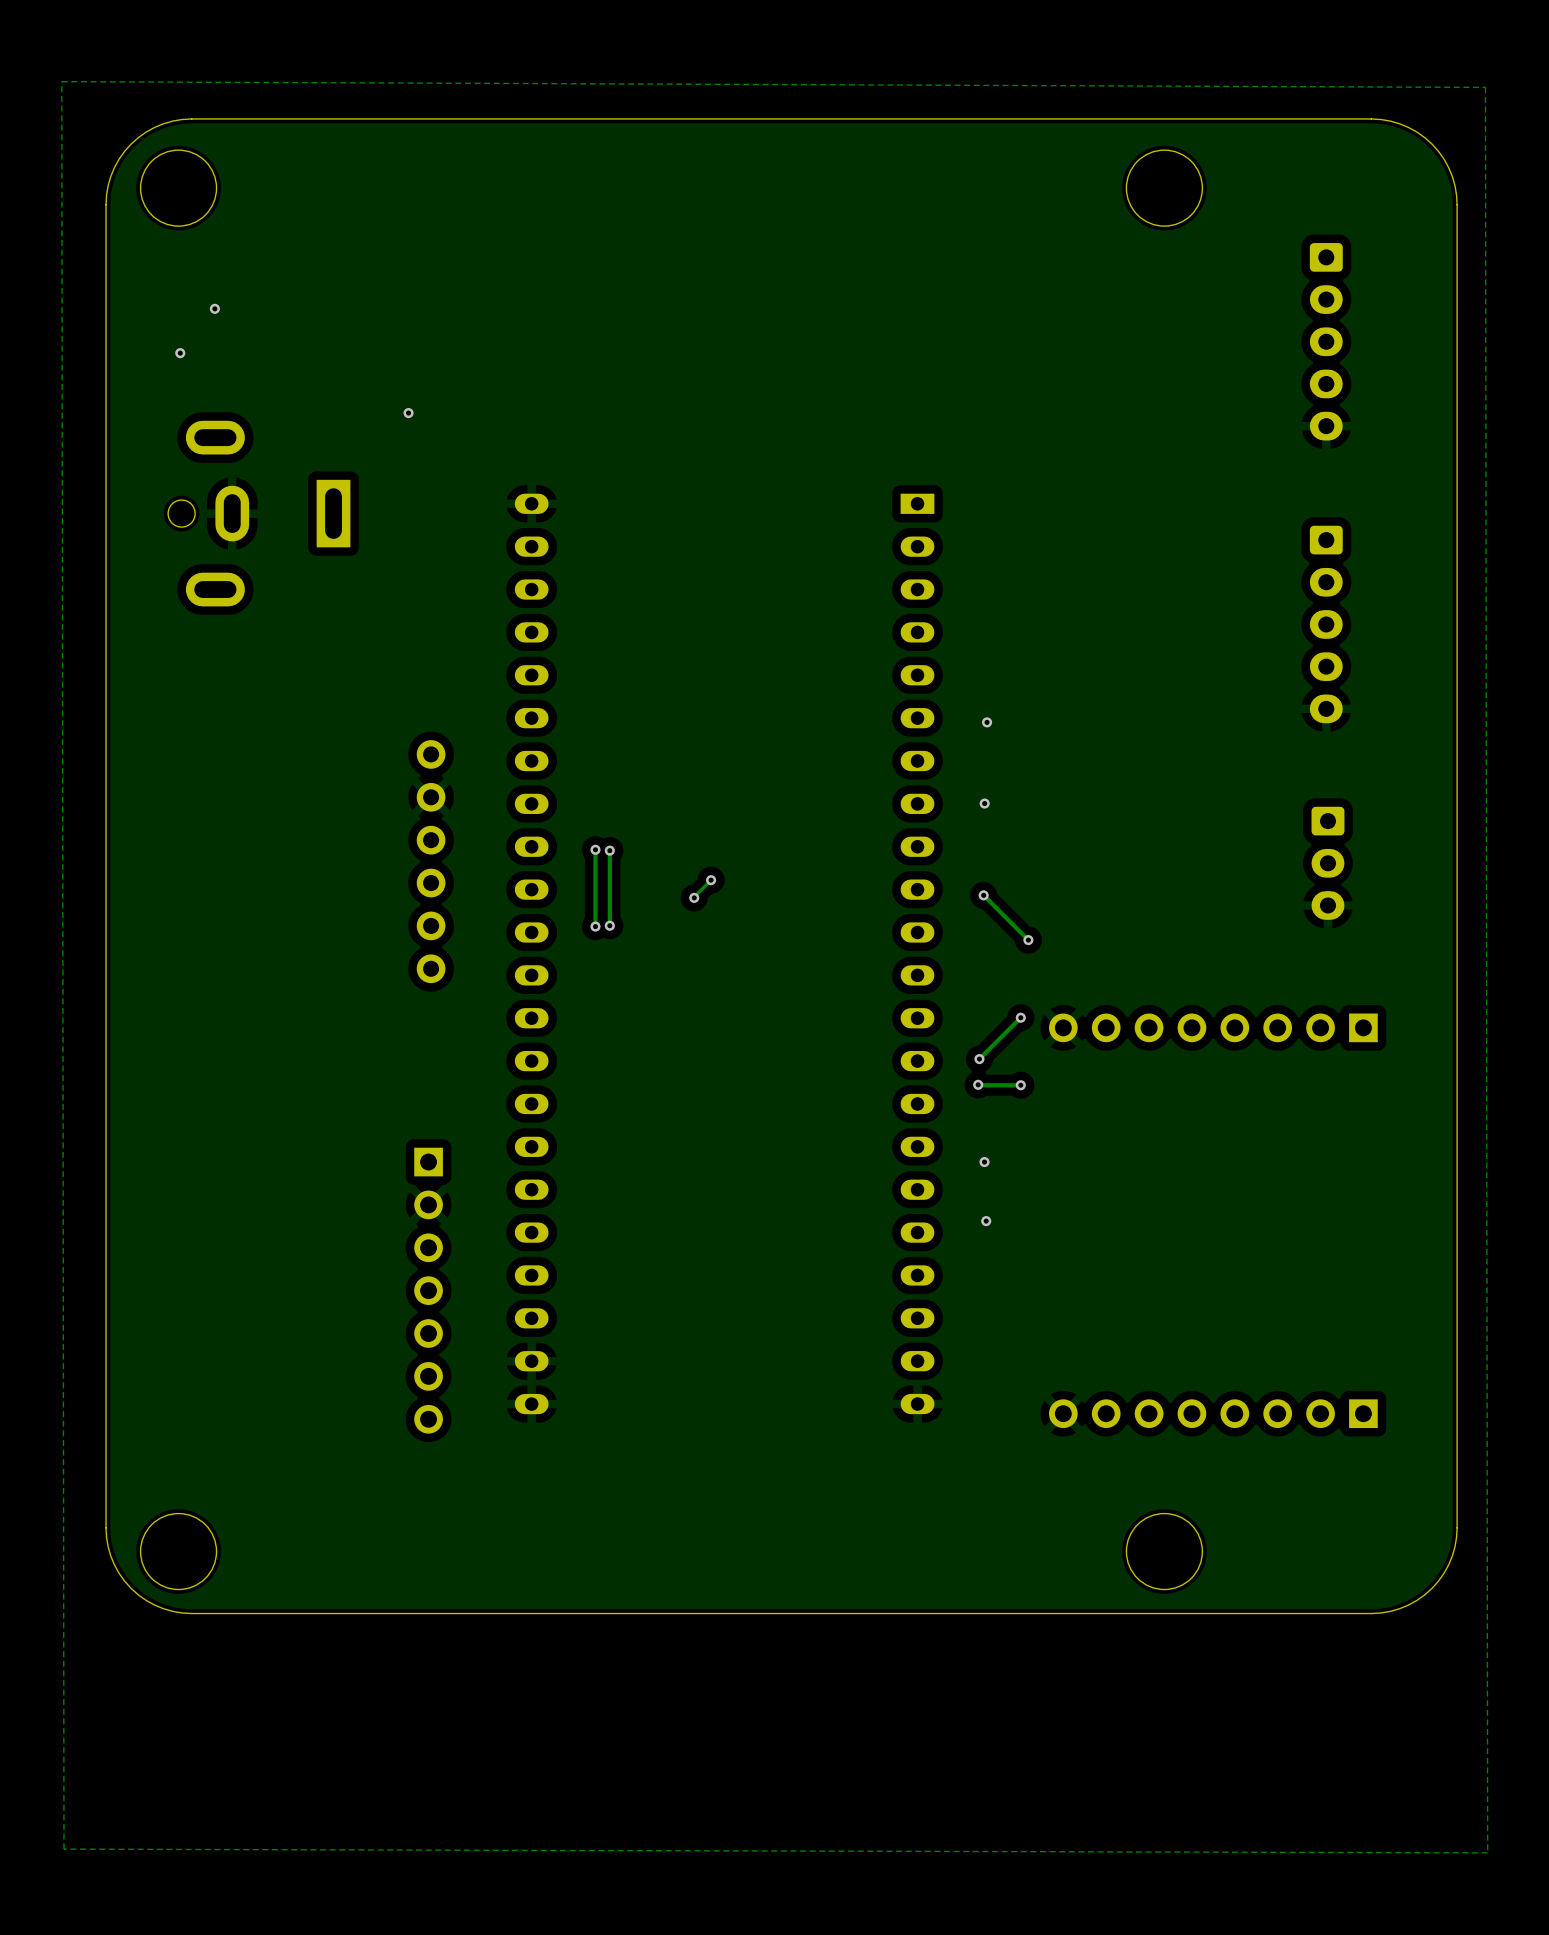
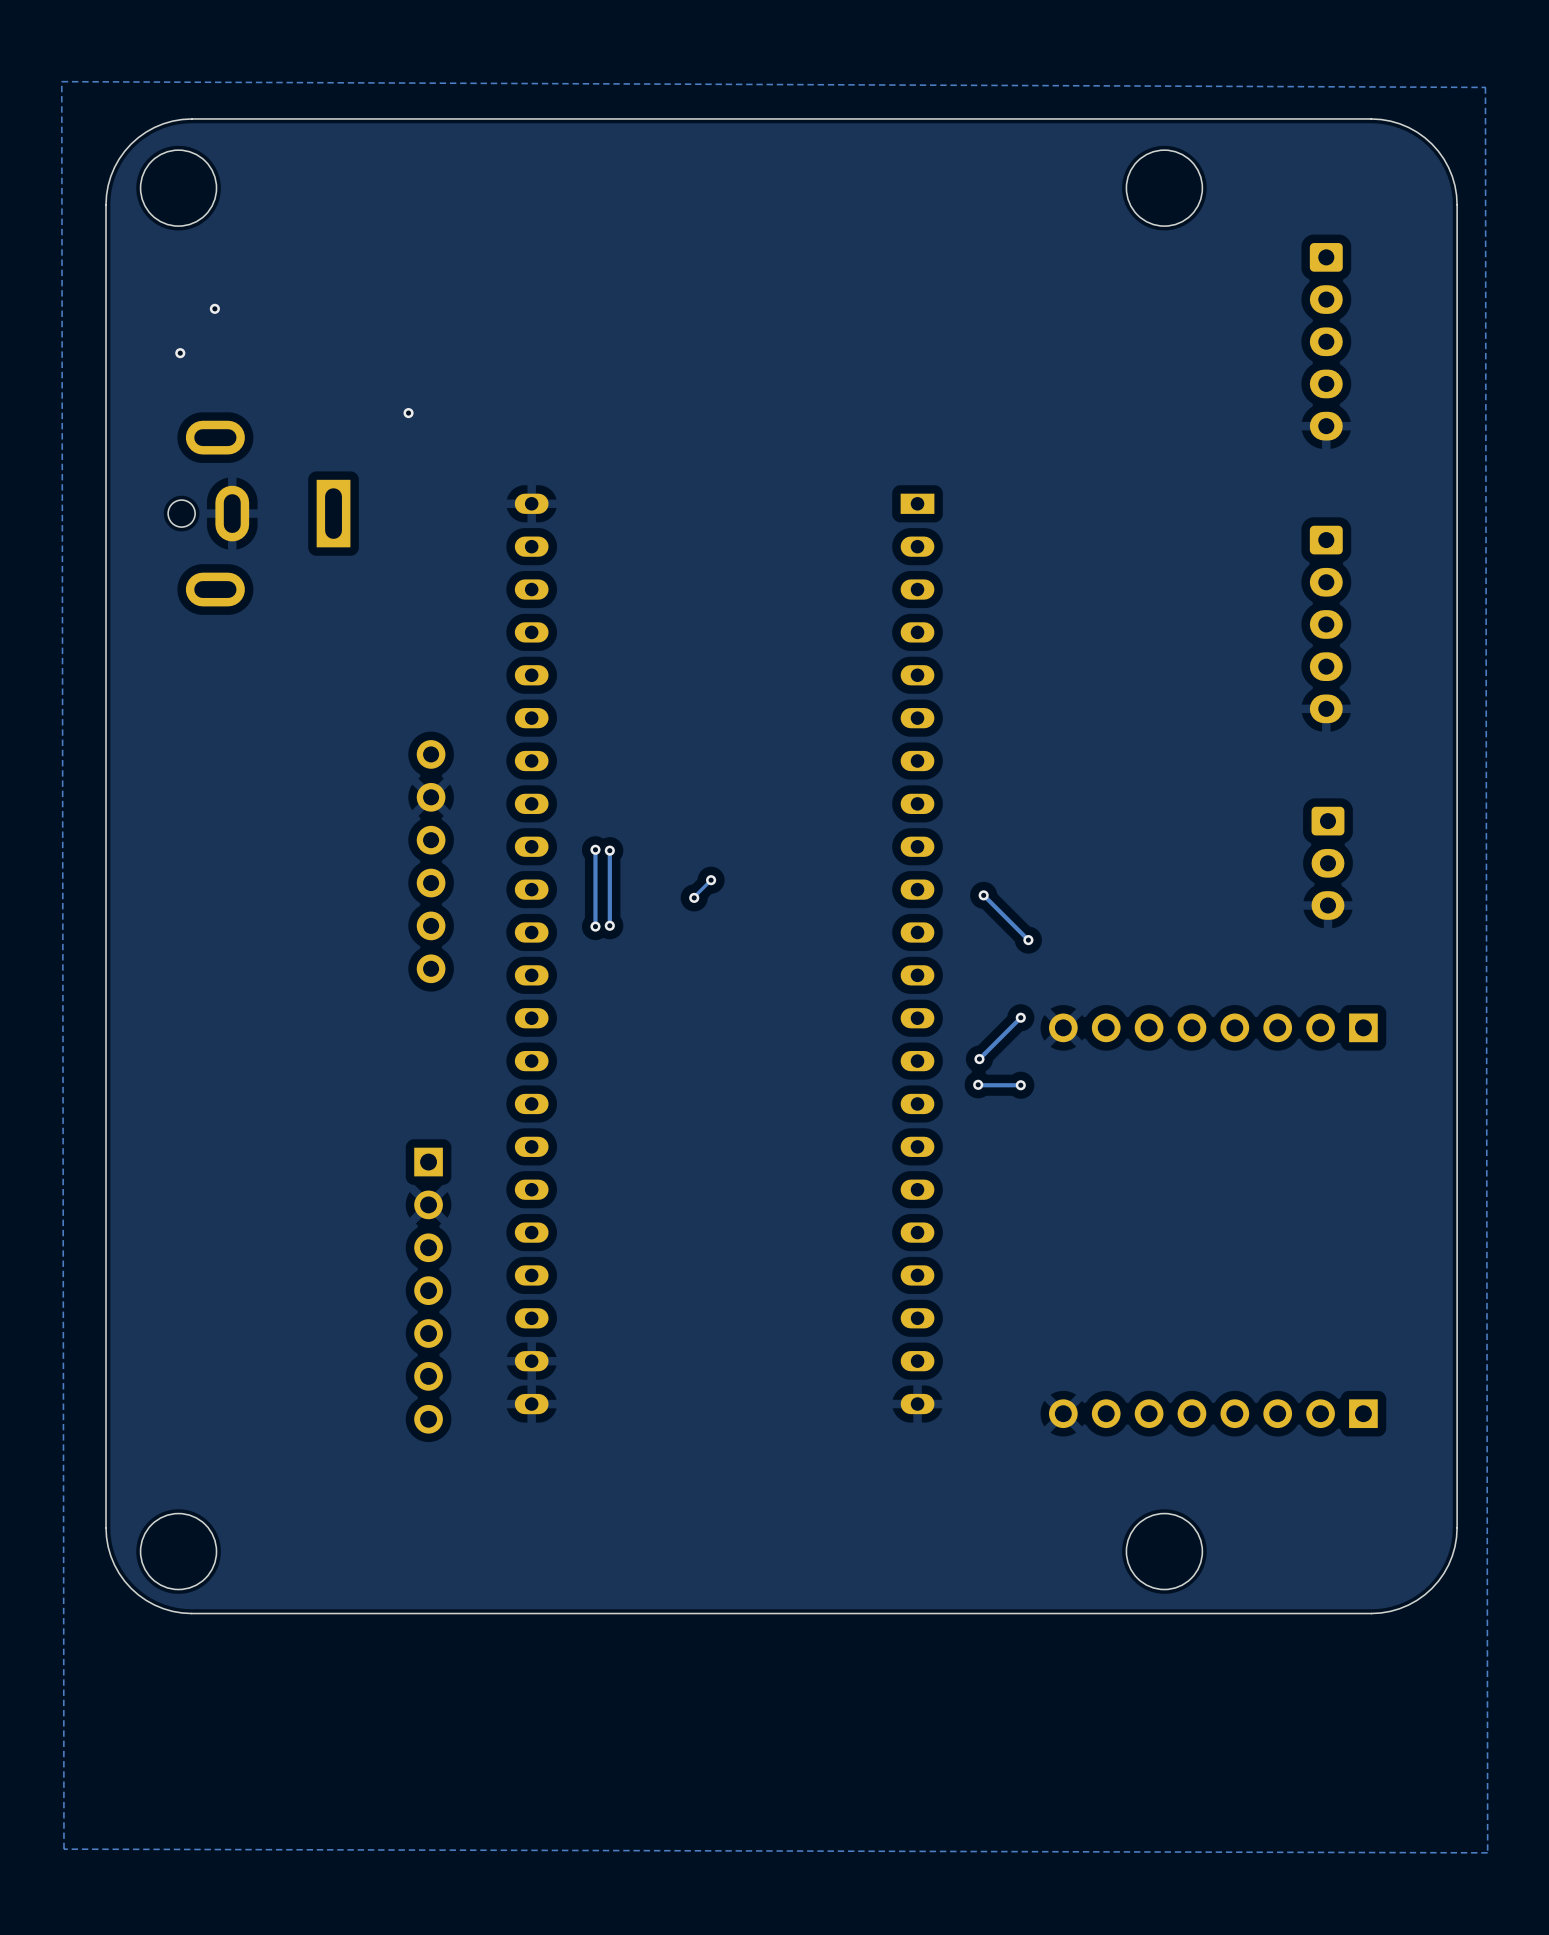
via: (987, 722) -> none
via: (984, 803) -> none
via: (984, 1162) -> none
via: (986, 1221) -> none

